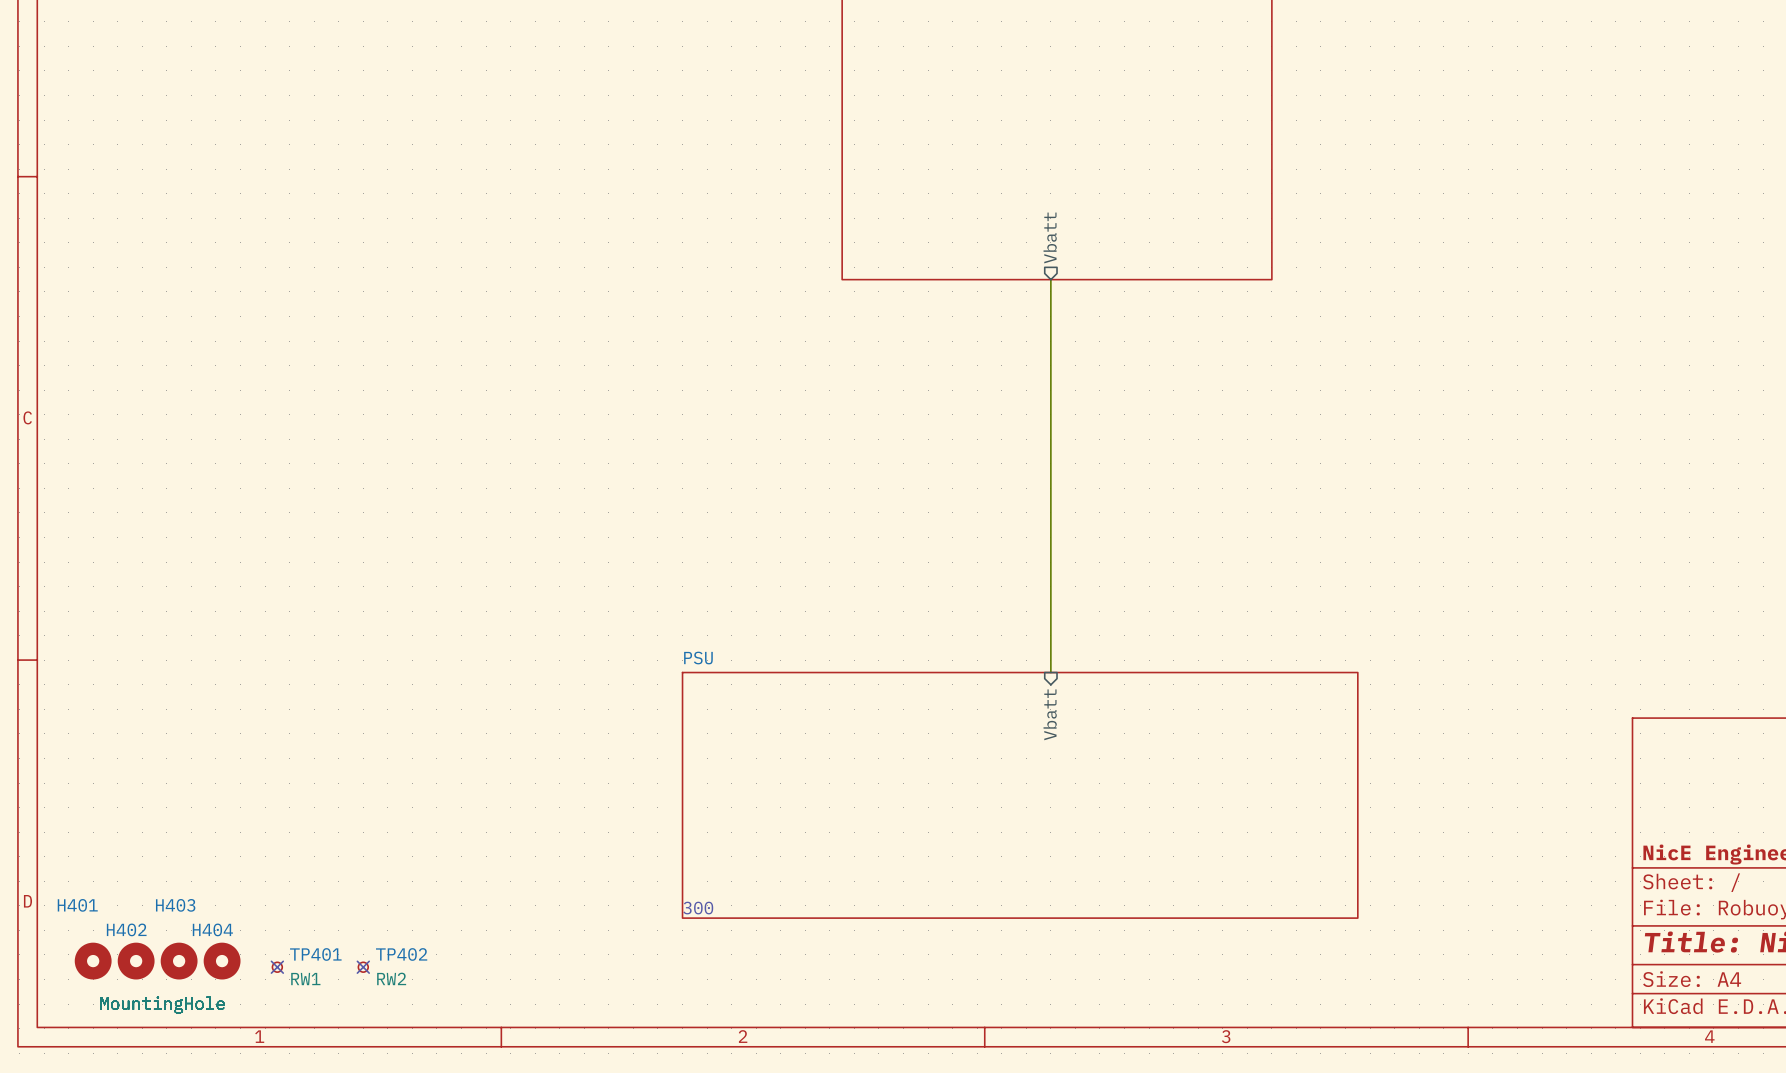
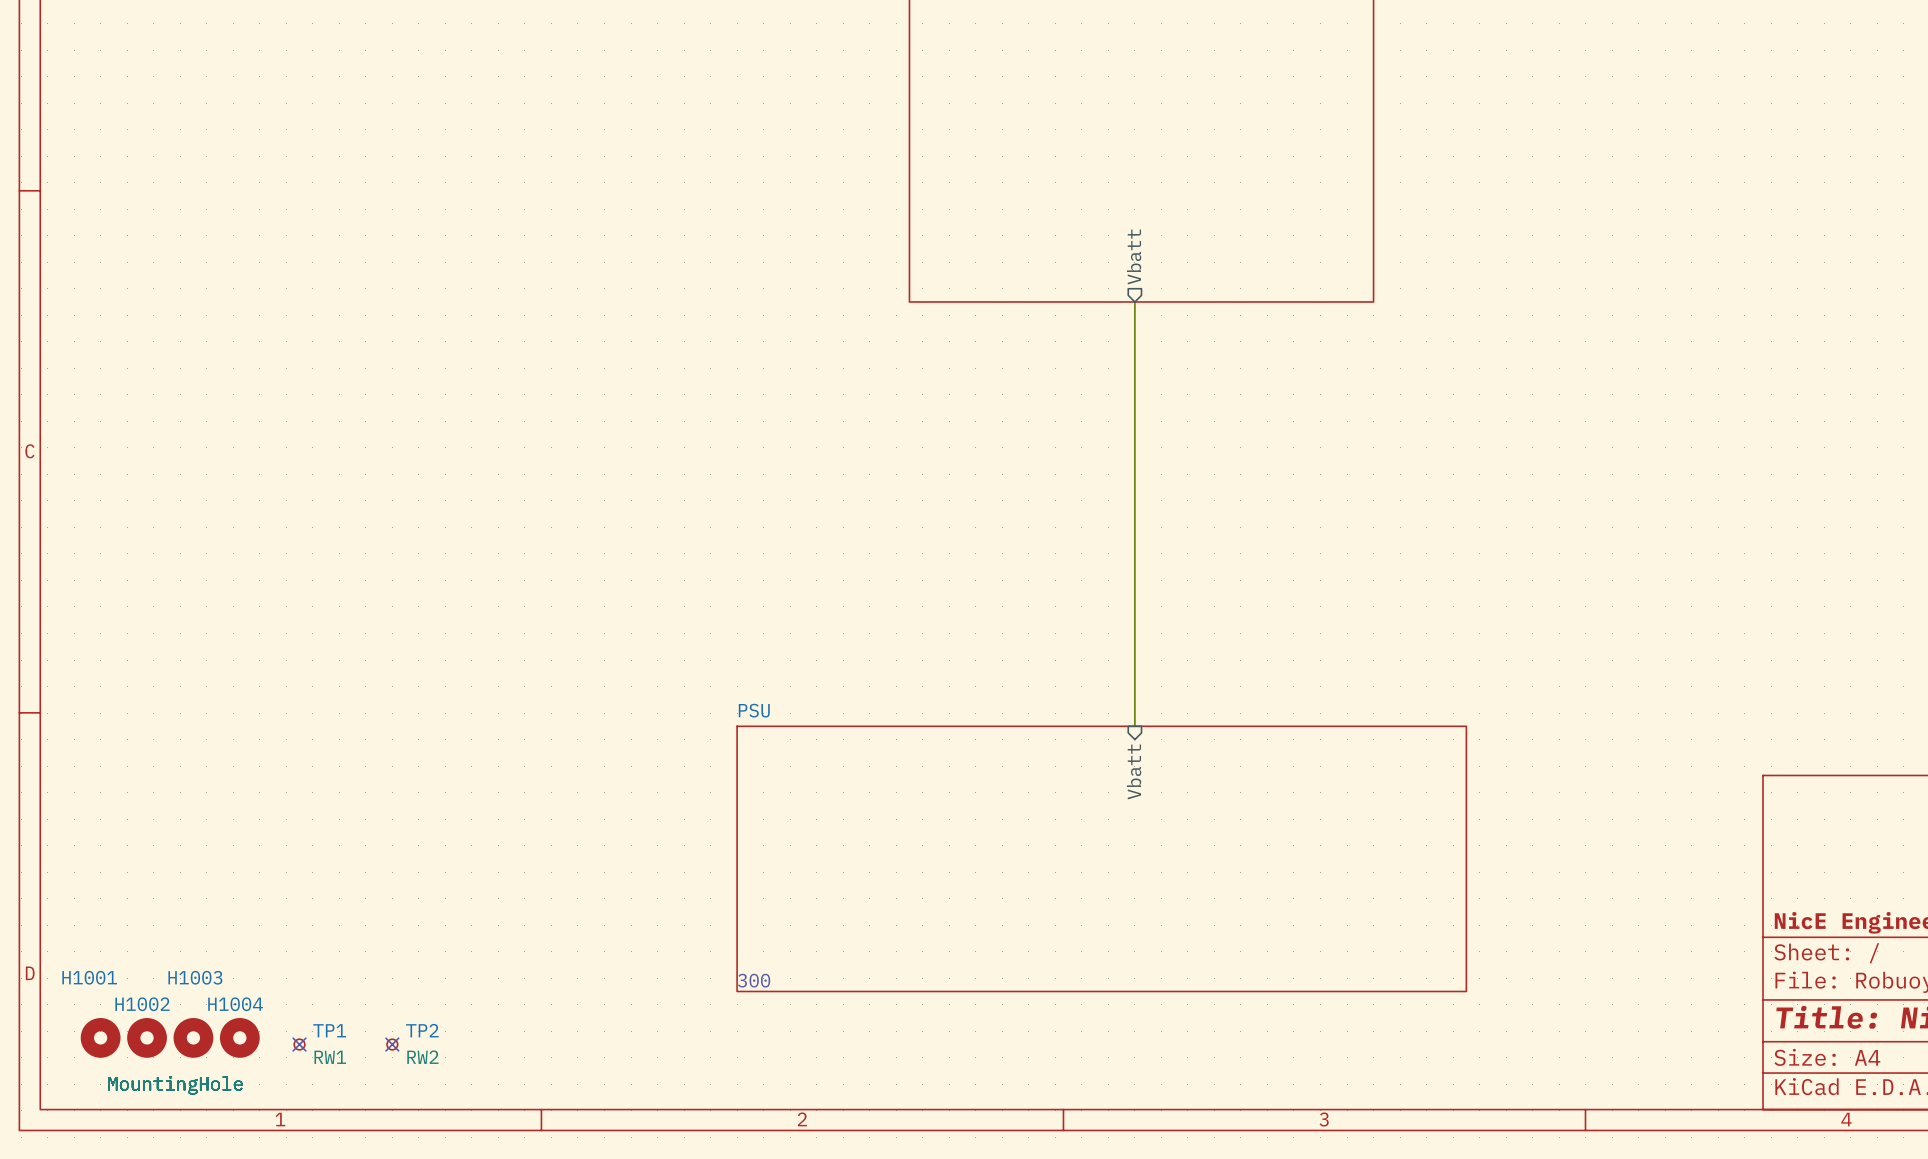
H401 name: H401 (77, 905) -> H1001 (89, 977)
H403 name: H403 (175, 905) -> H1003 (195, 977)
H402 name: H402 (126, 929) -> H1002 (142, 1004)
H404 name: H404 (212, 929) -> H1004 (235, 1004)
TP401 name: TP401 (315, 954) -> TP1 (329, 1030)
TP402 name: TP402 (401, 954) -> TP2 (422, 1030)

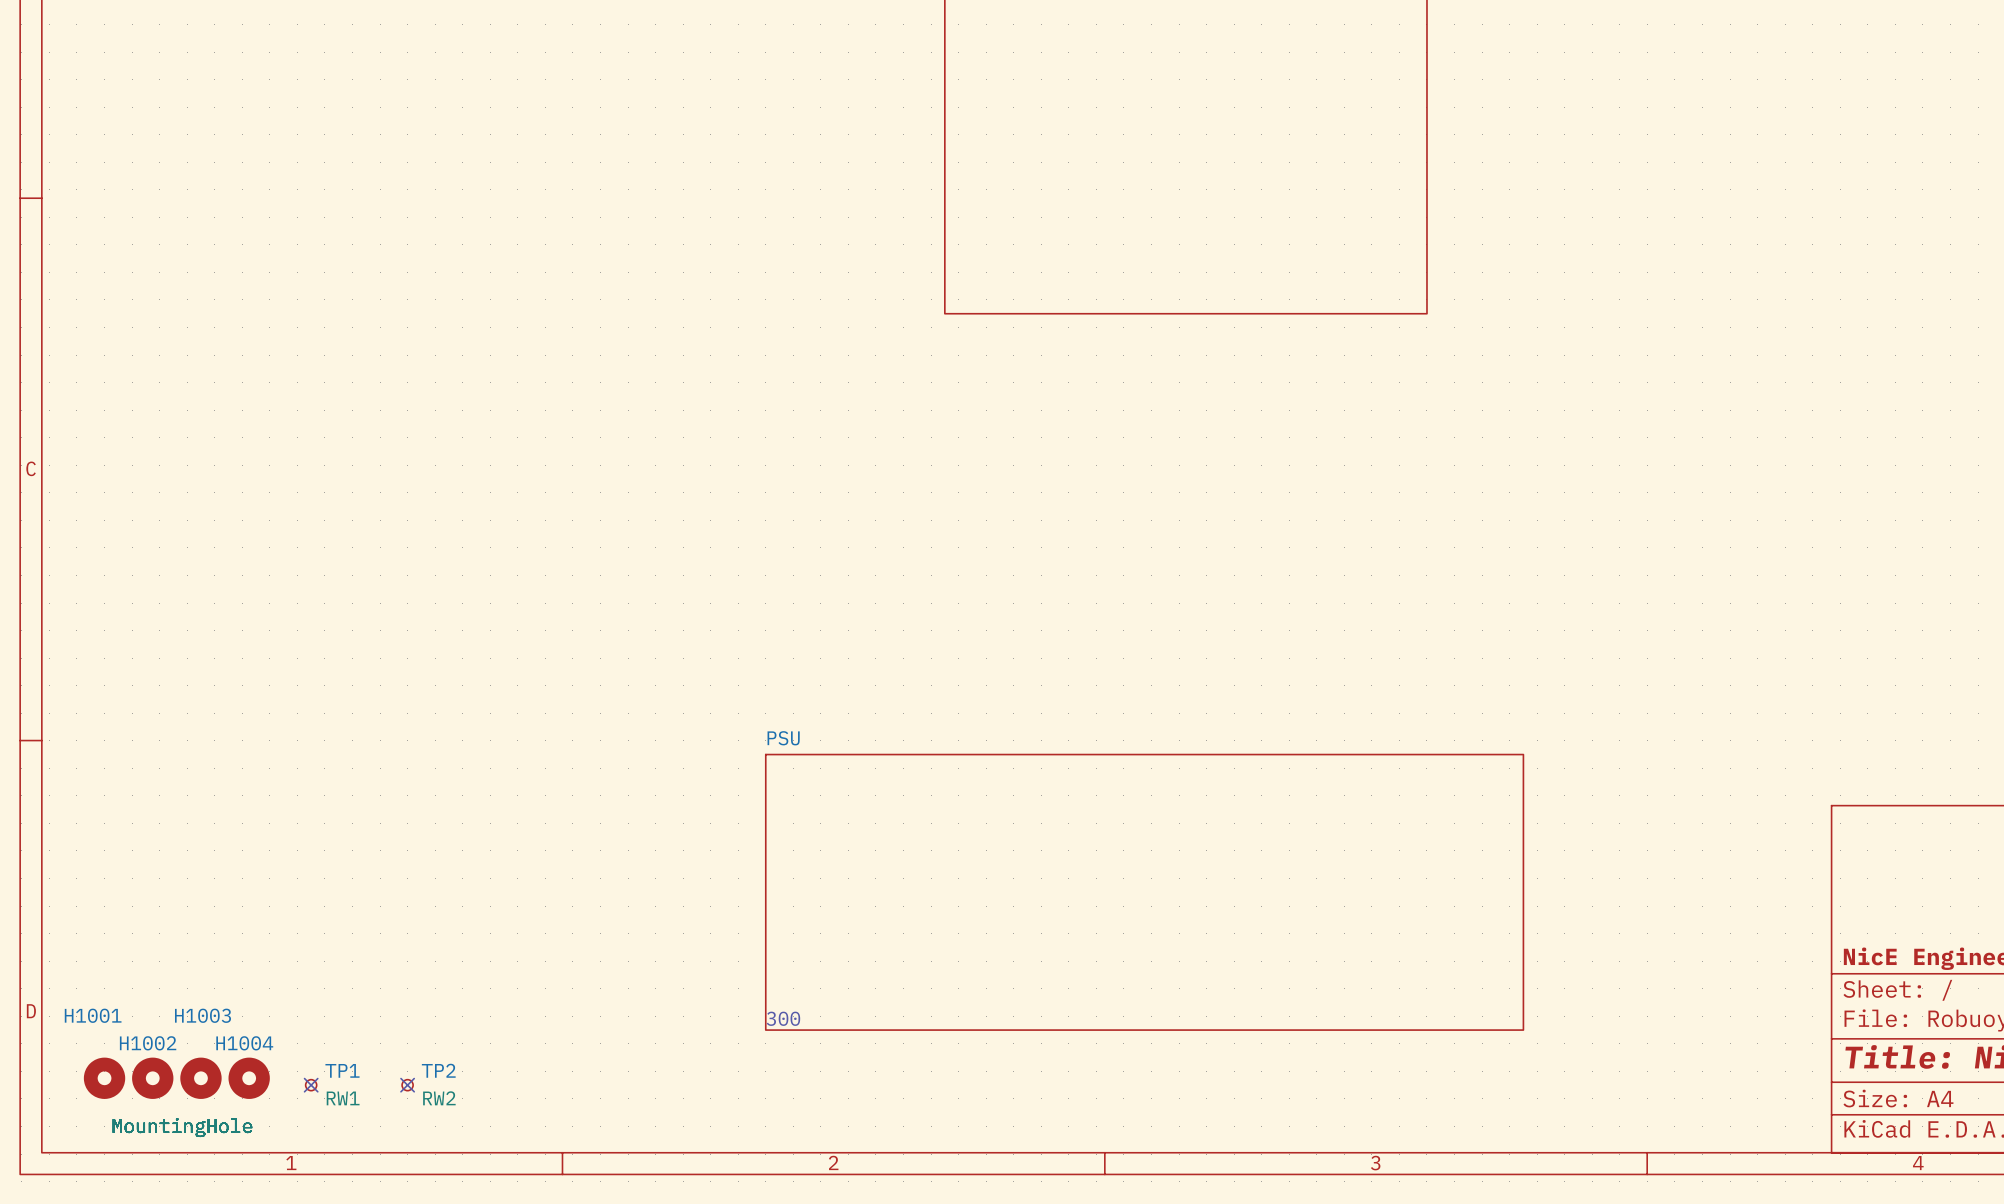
sheet pin: Vbatt (1134, 257) -> none
wire: (1134, 301) (1134, 726) -> none
sheet pin: Vbatt (1134, 772) -> none

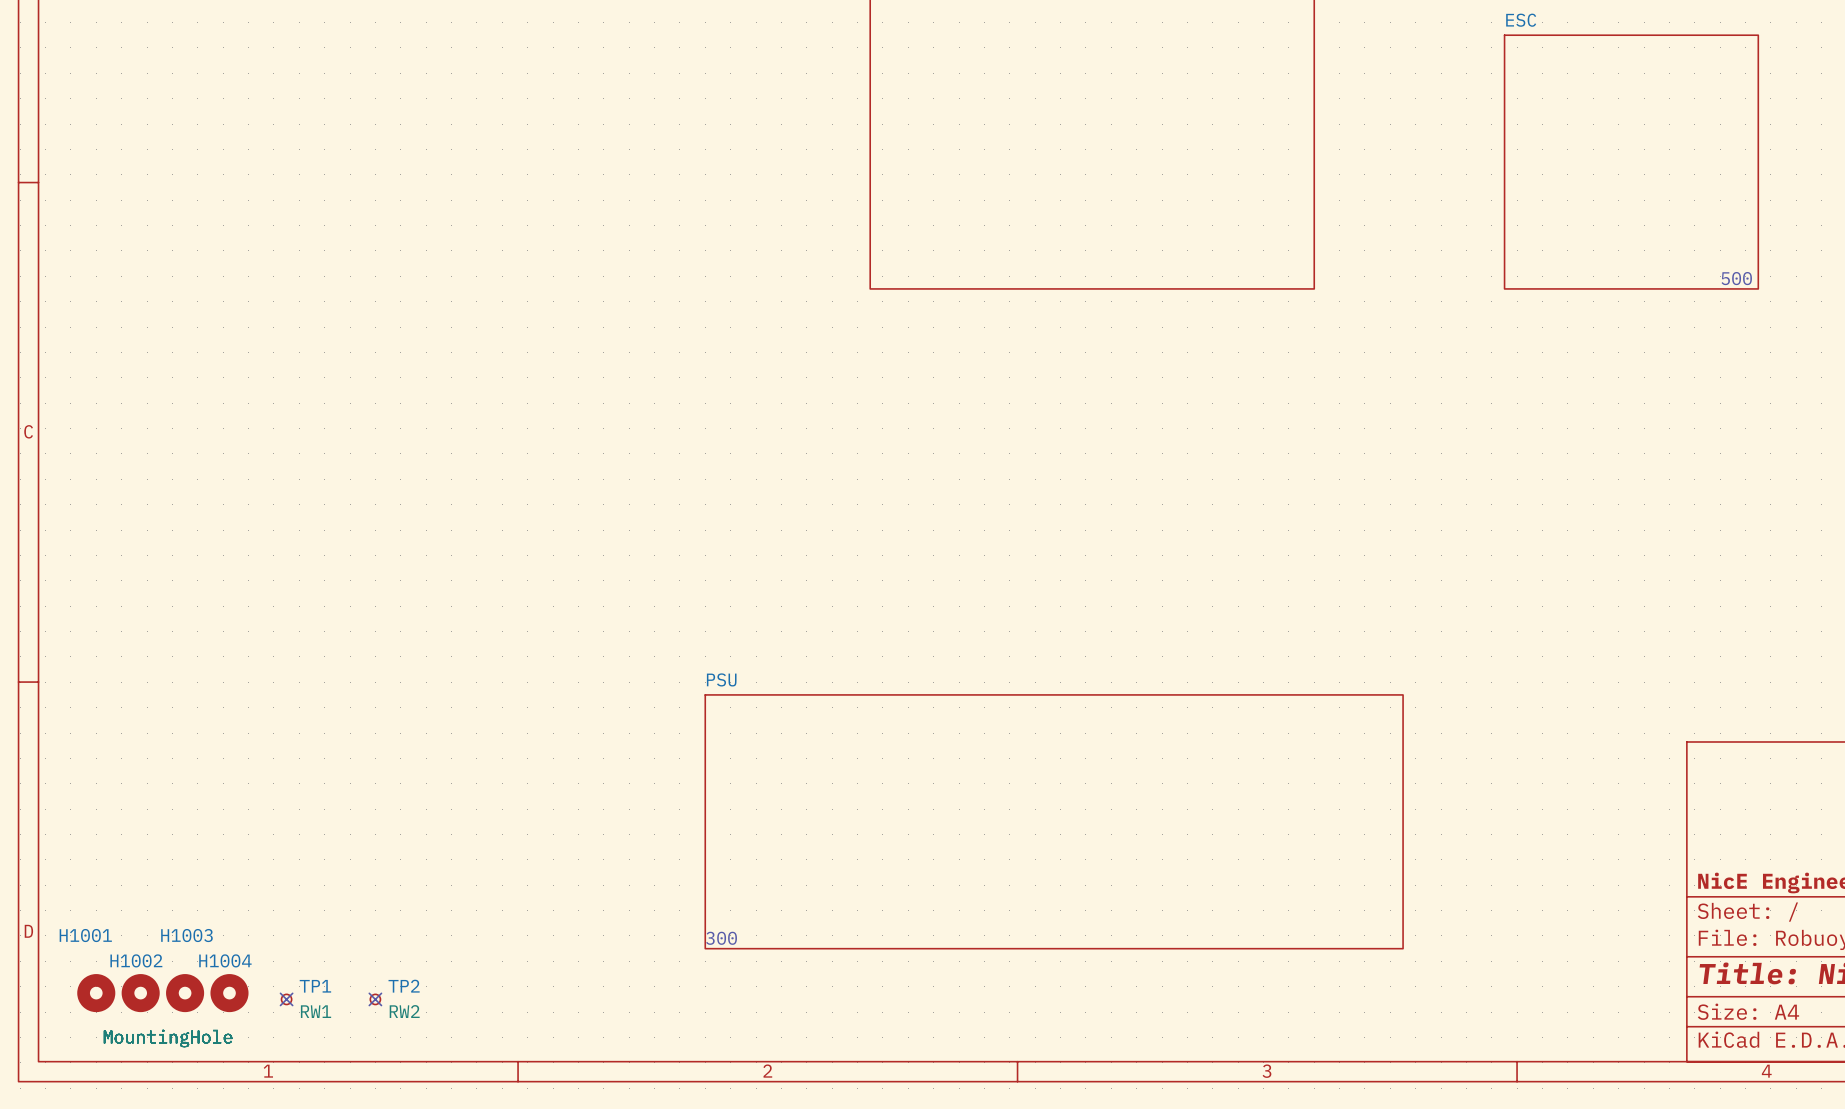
sheet ESC: none -> (1631, 162)
text: none -> 500 (1736, 278)

